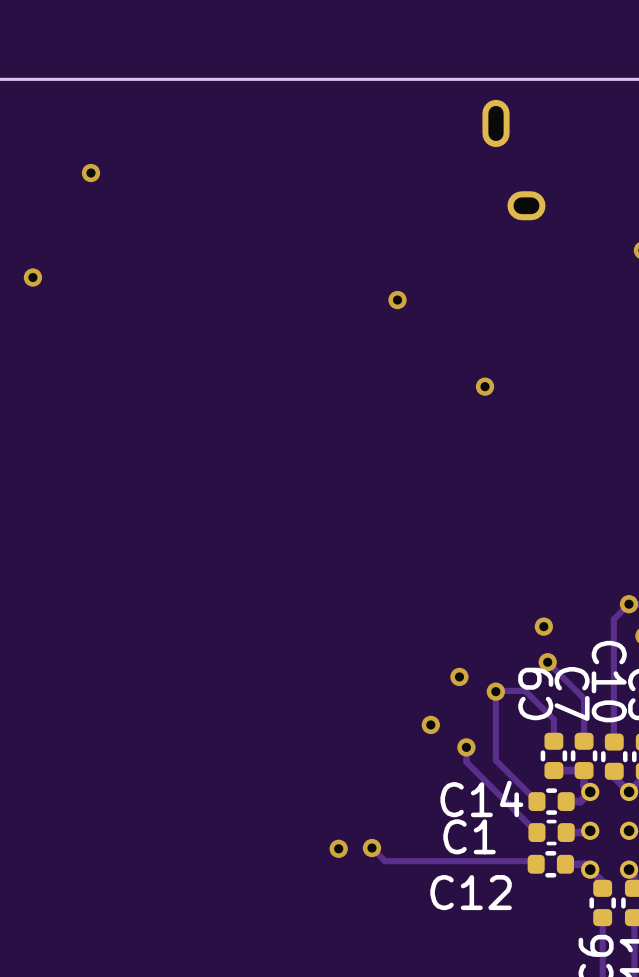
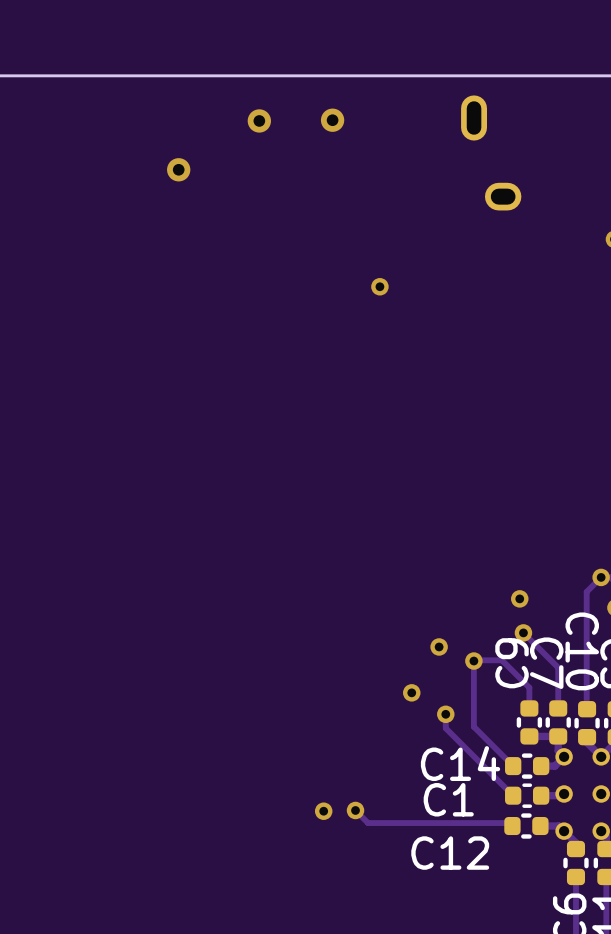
via: none -> (332, 120)
via: none -> (259, 120)
via: (90, 173) -> none
via: none -> (178, 169)
via: (32, 277) -> none
via: (485, 386) -> none

